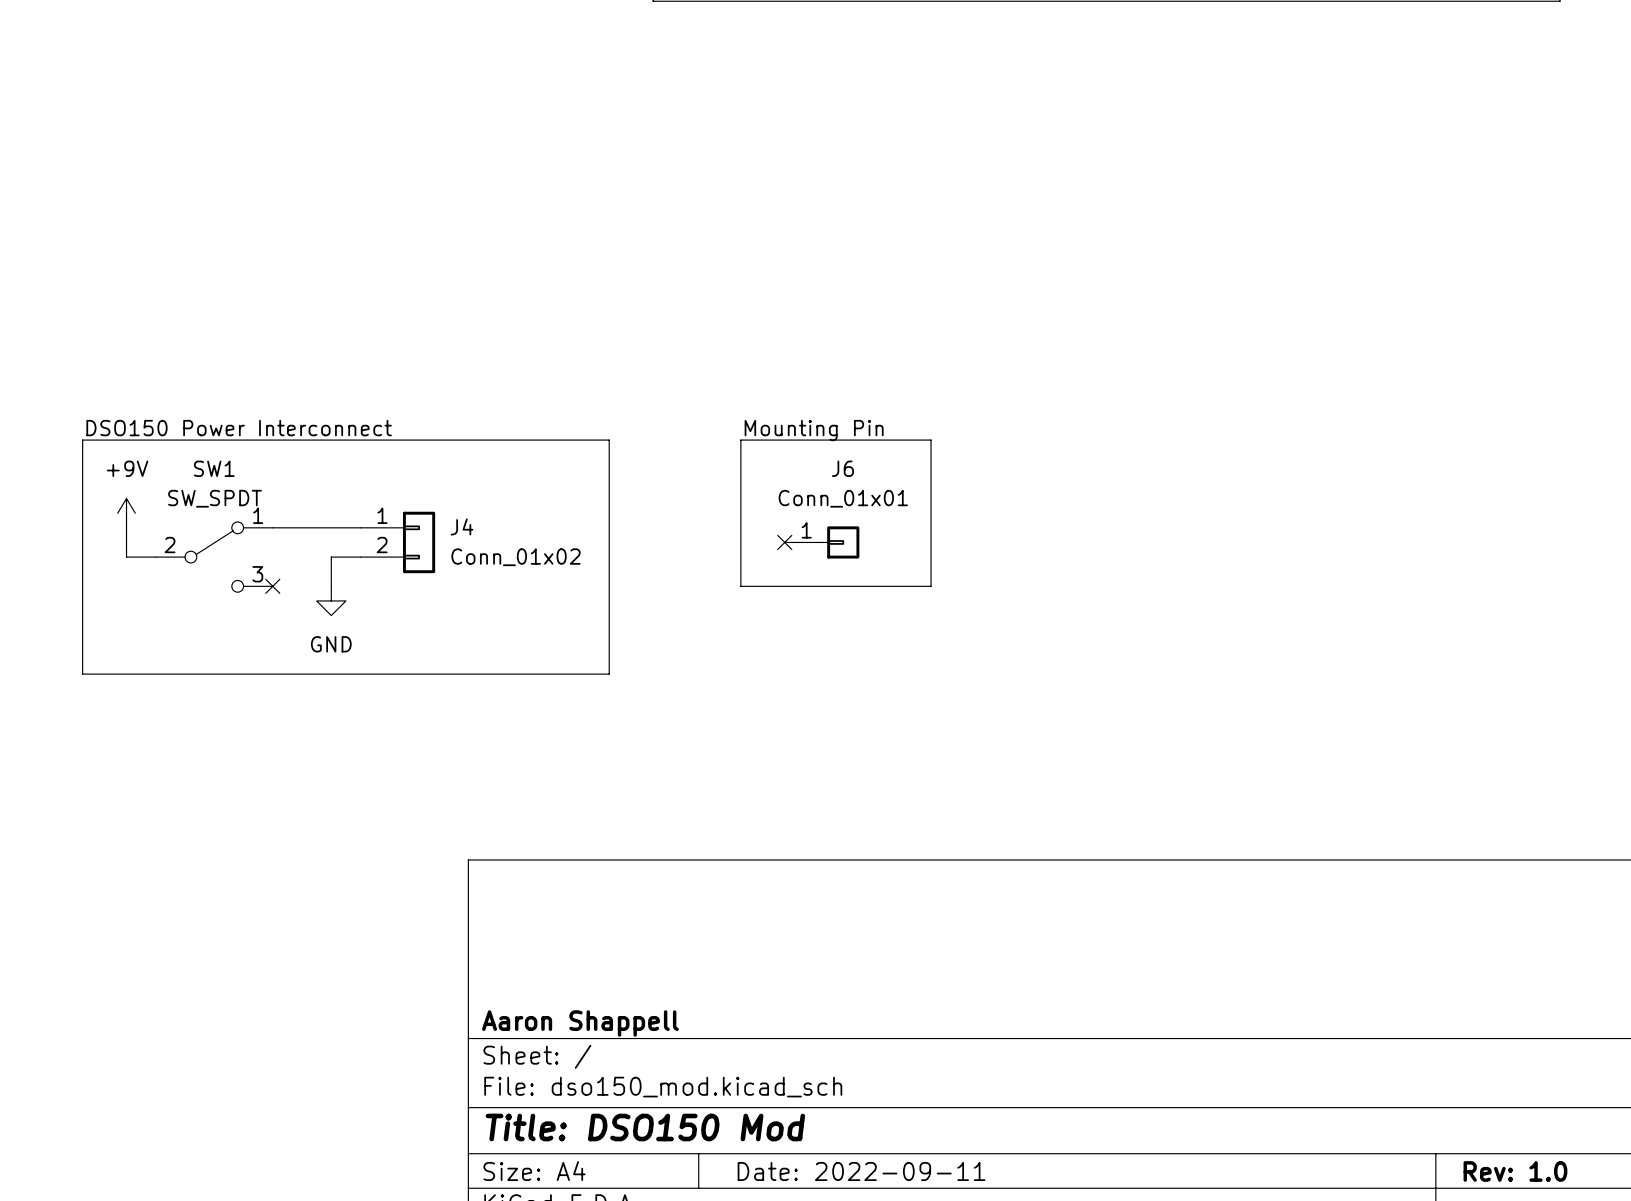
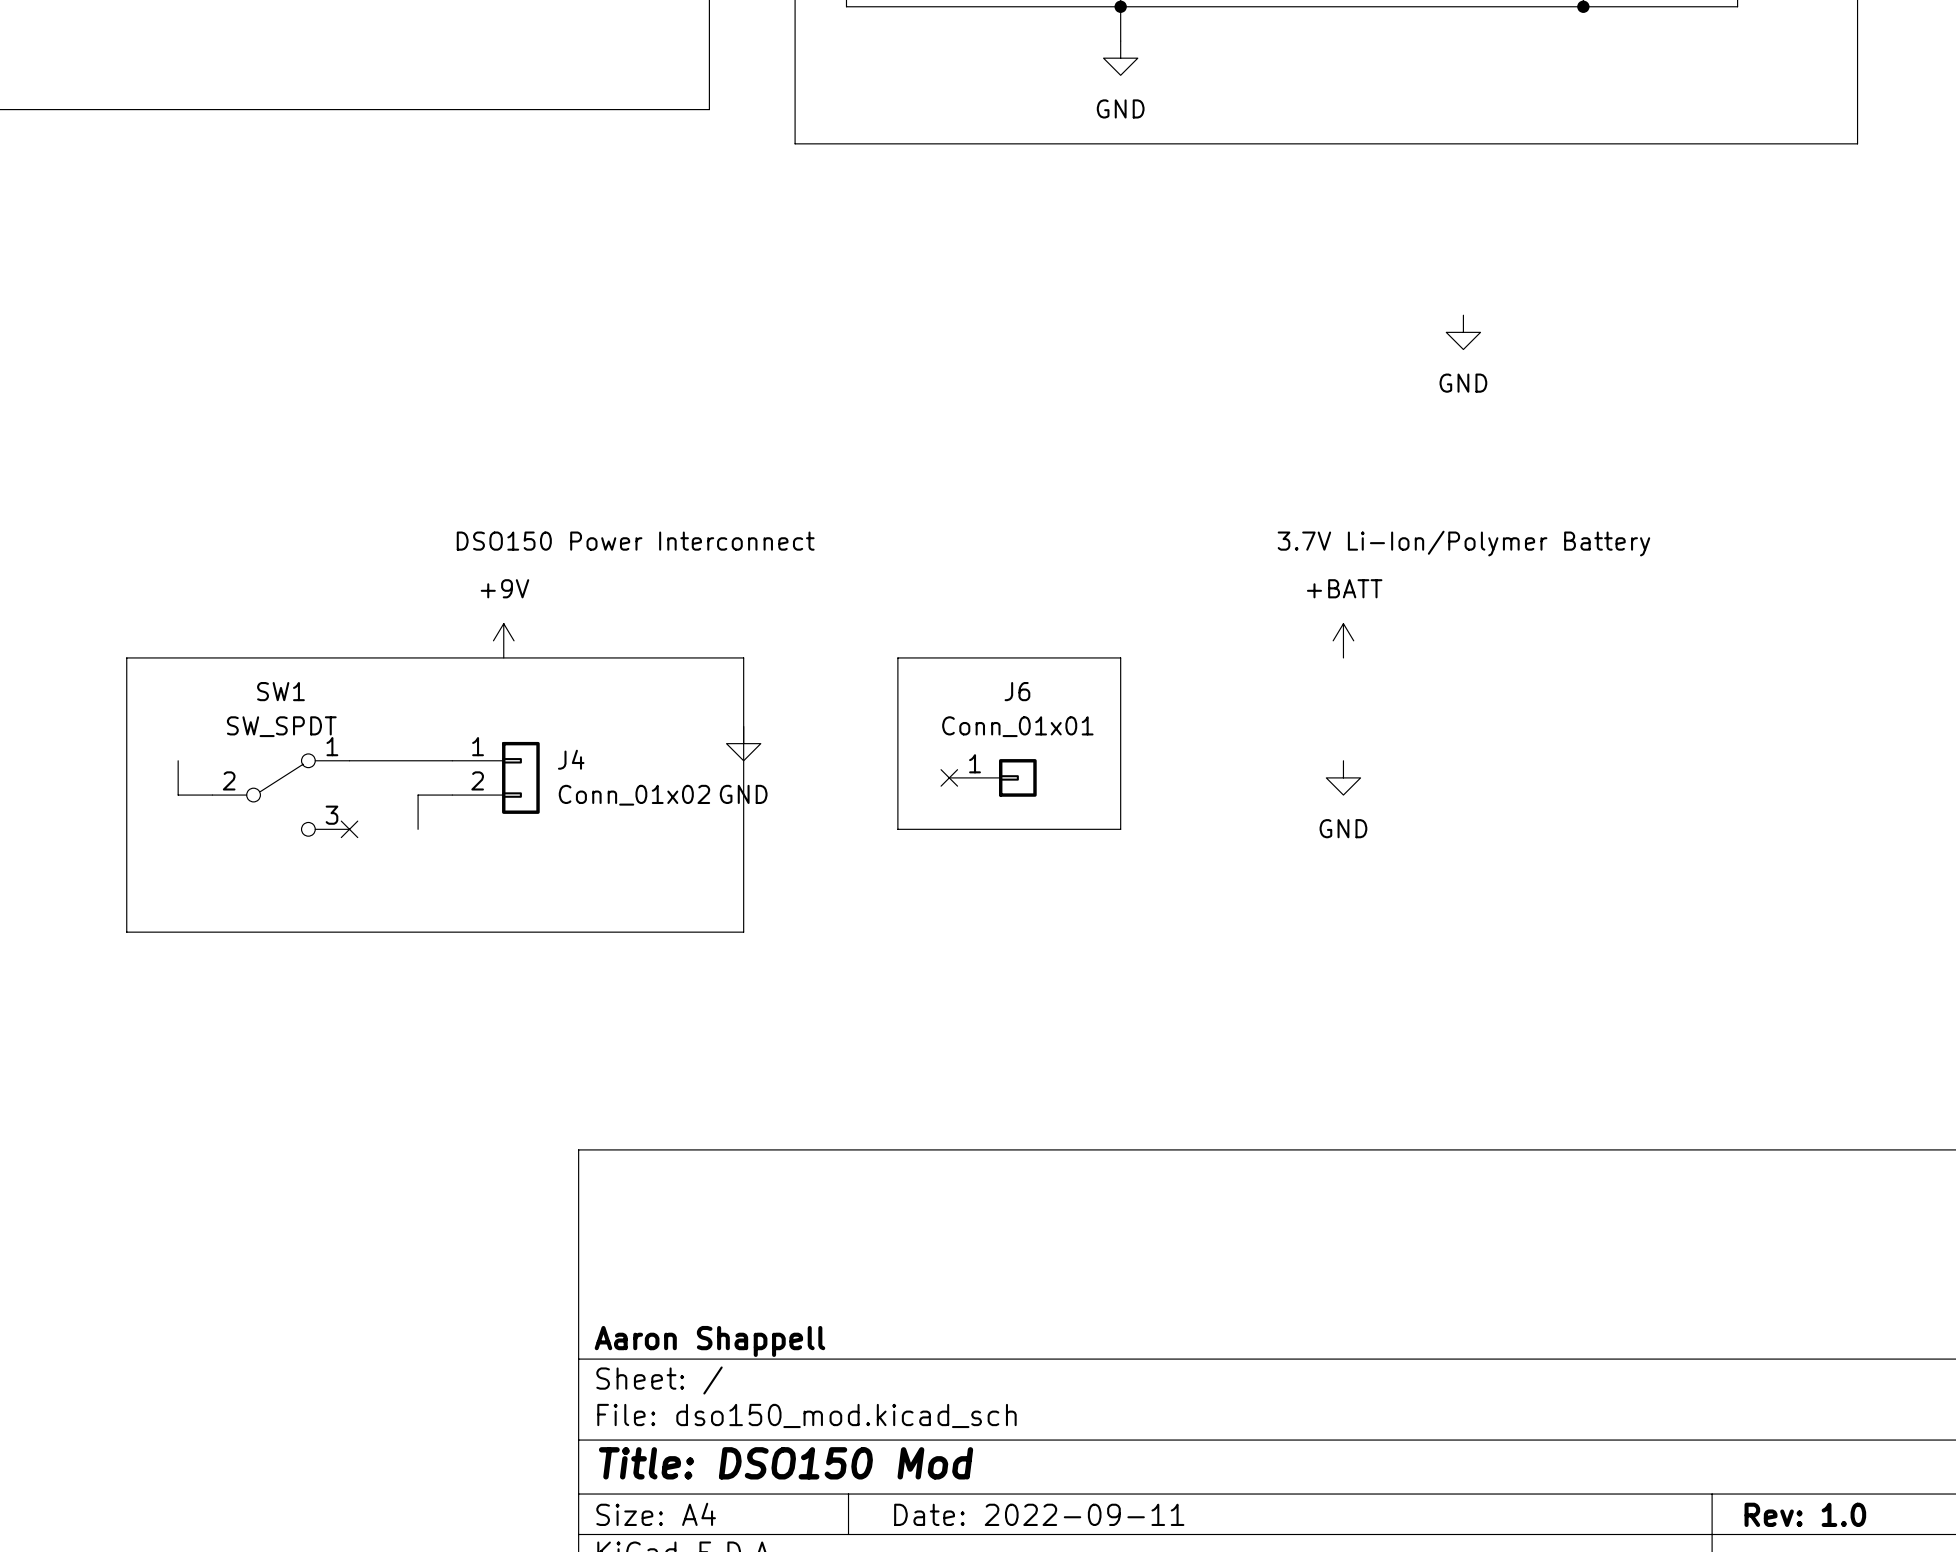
power symbol: none -> GND (1463, 332)
text: none -> DSO150 Power Interconnect (635, 541)
text: none -> 3.7V Li-Ion/Polymer Battery (1463, 543)
power symbol: none -> +9V (503, 640)
power symbol: none -> +BATT (1343, 640)
text: DSO150 Power Interconnect (239, 428) -> none
text: Mounting Pin (814, 430) -> none
power symbol: +9V (126, 513) -> none
power symbol: none -> GND (743, 743)
power symbol: none -> GND (1343, 777)
power symbol: GND (331, 600) -> none

